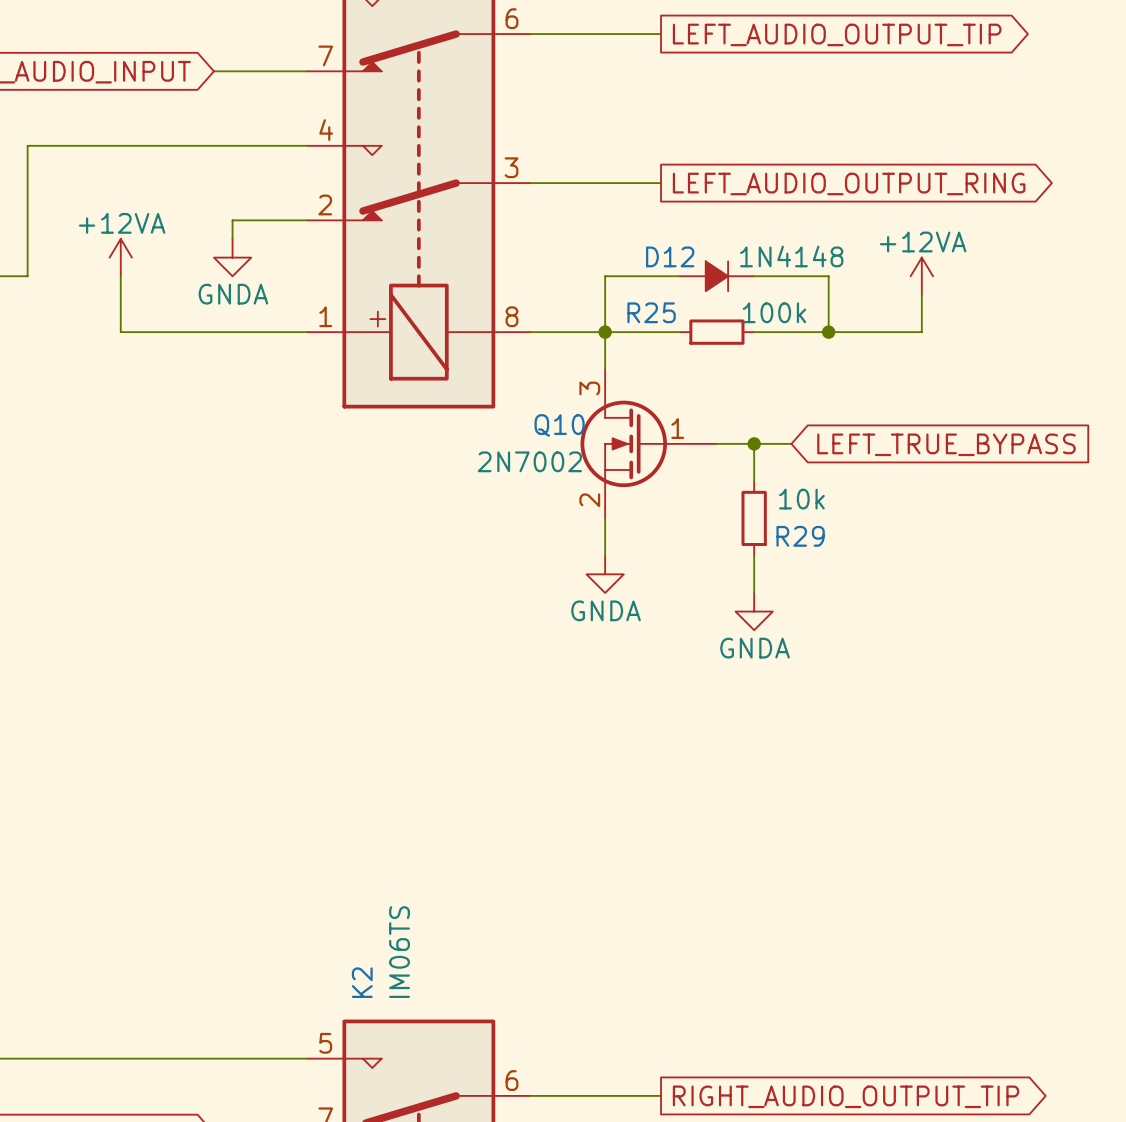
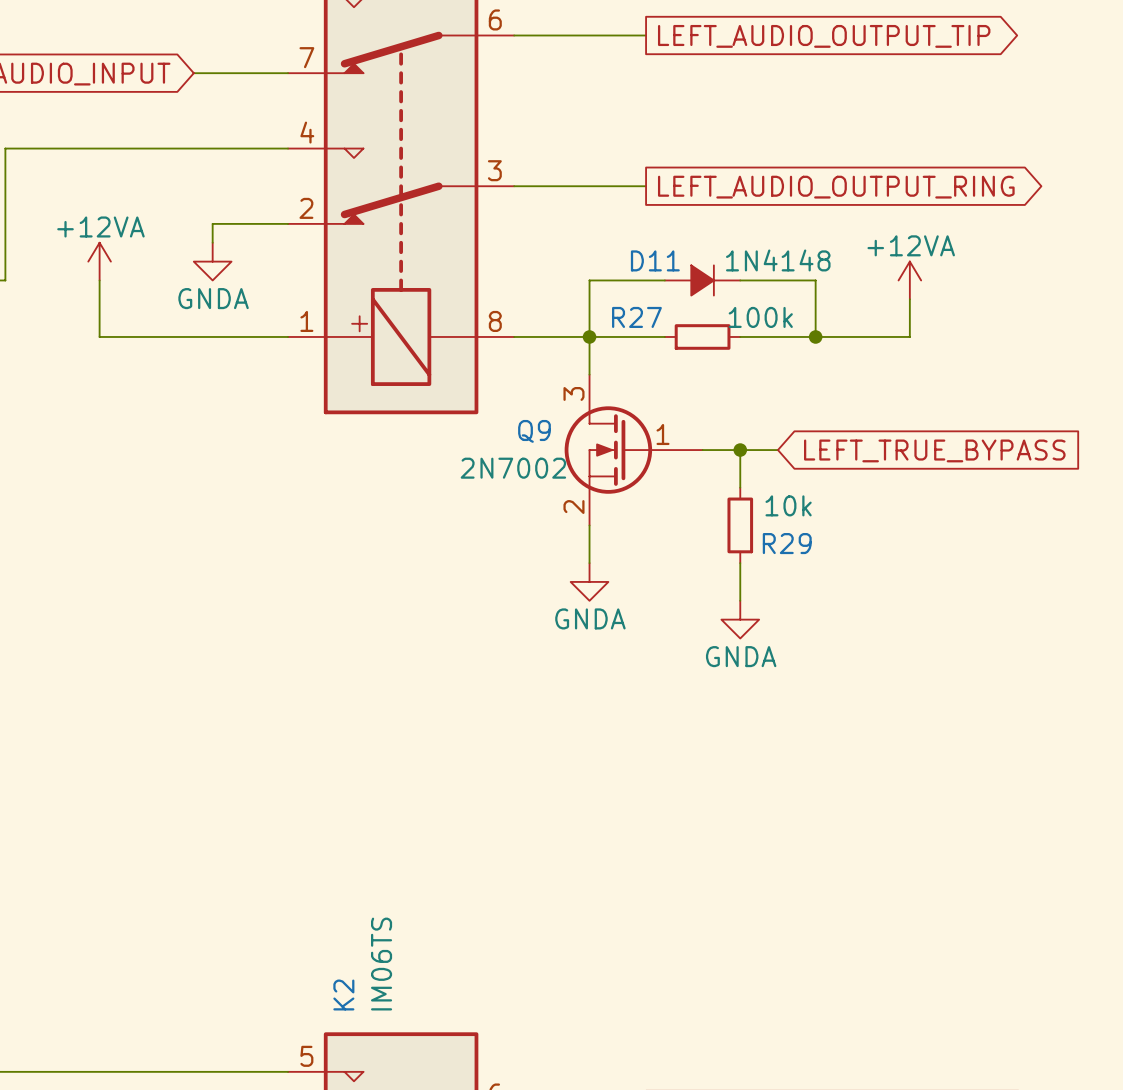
D12 name: D12 (670, 256) -> D11 (655, 260)
R25 name: R25 (651, 312) -> R27 (636, 317)
Q10 name: Q10 (559, 425) -> Q9 (534, 431)

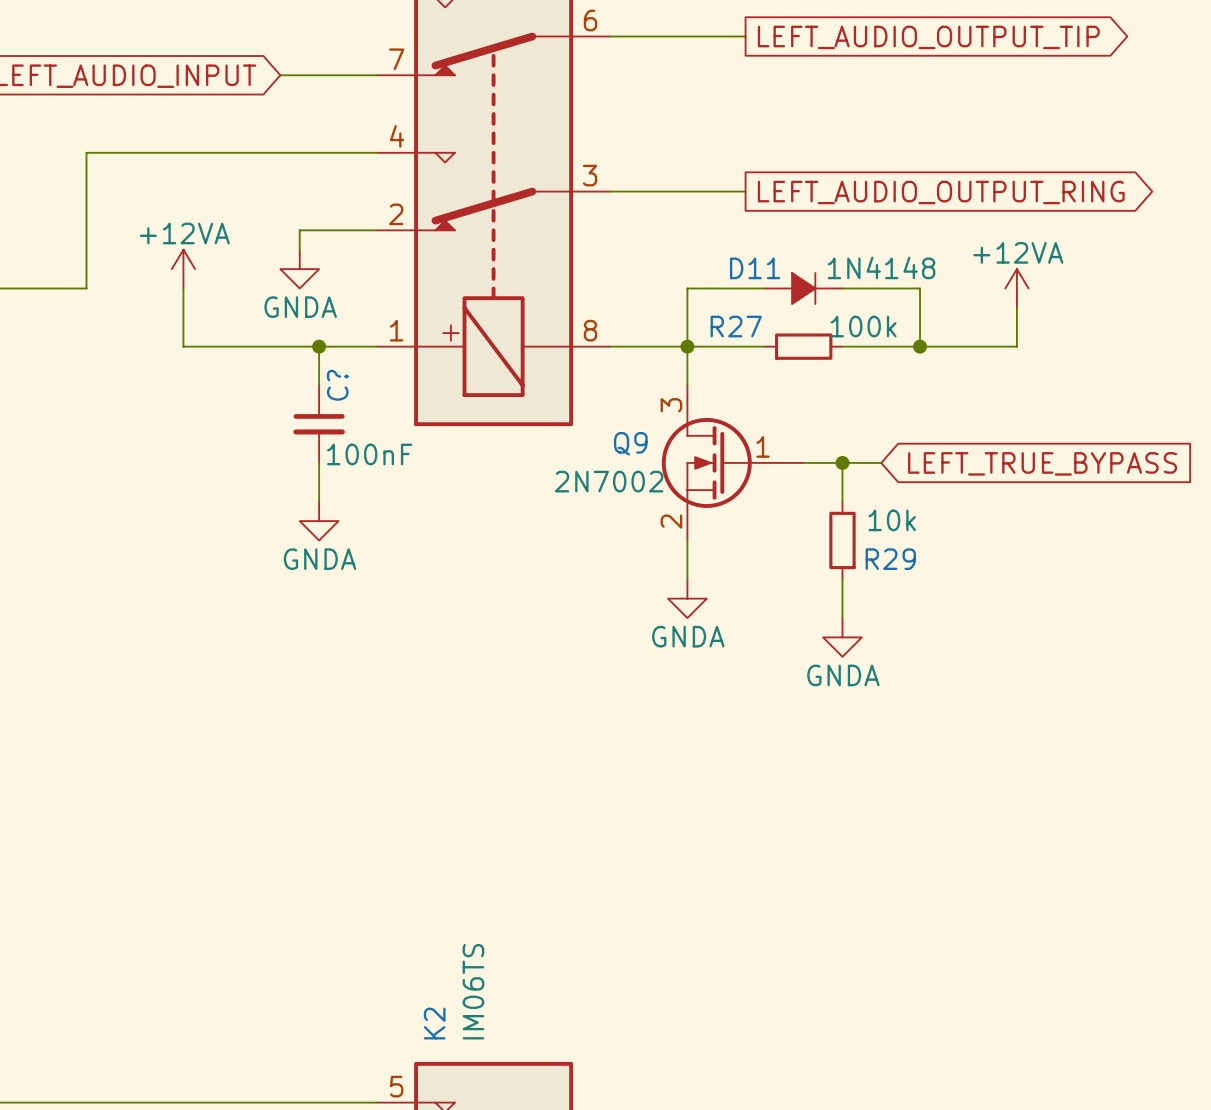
wire: none -> (319, 346) (319, 385)
junction: none -> (319, 346)
C?: none -> 100nF (319, 424)
wire: none -> (319, 462) (319, 501)
power symbol: none -> GNDA (319, 521)

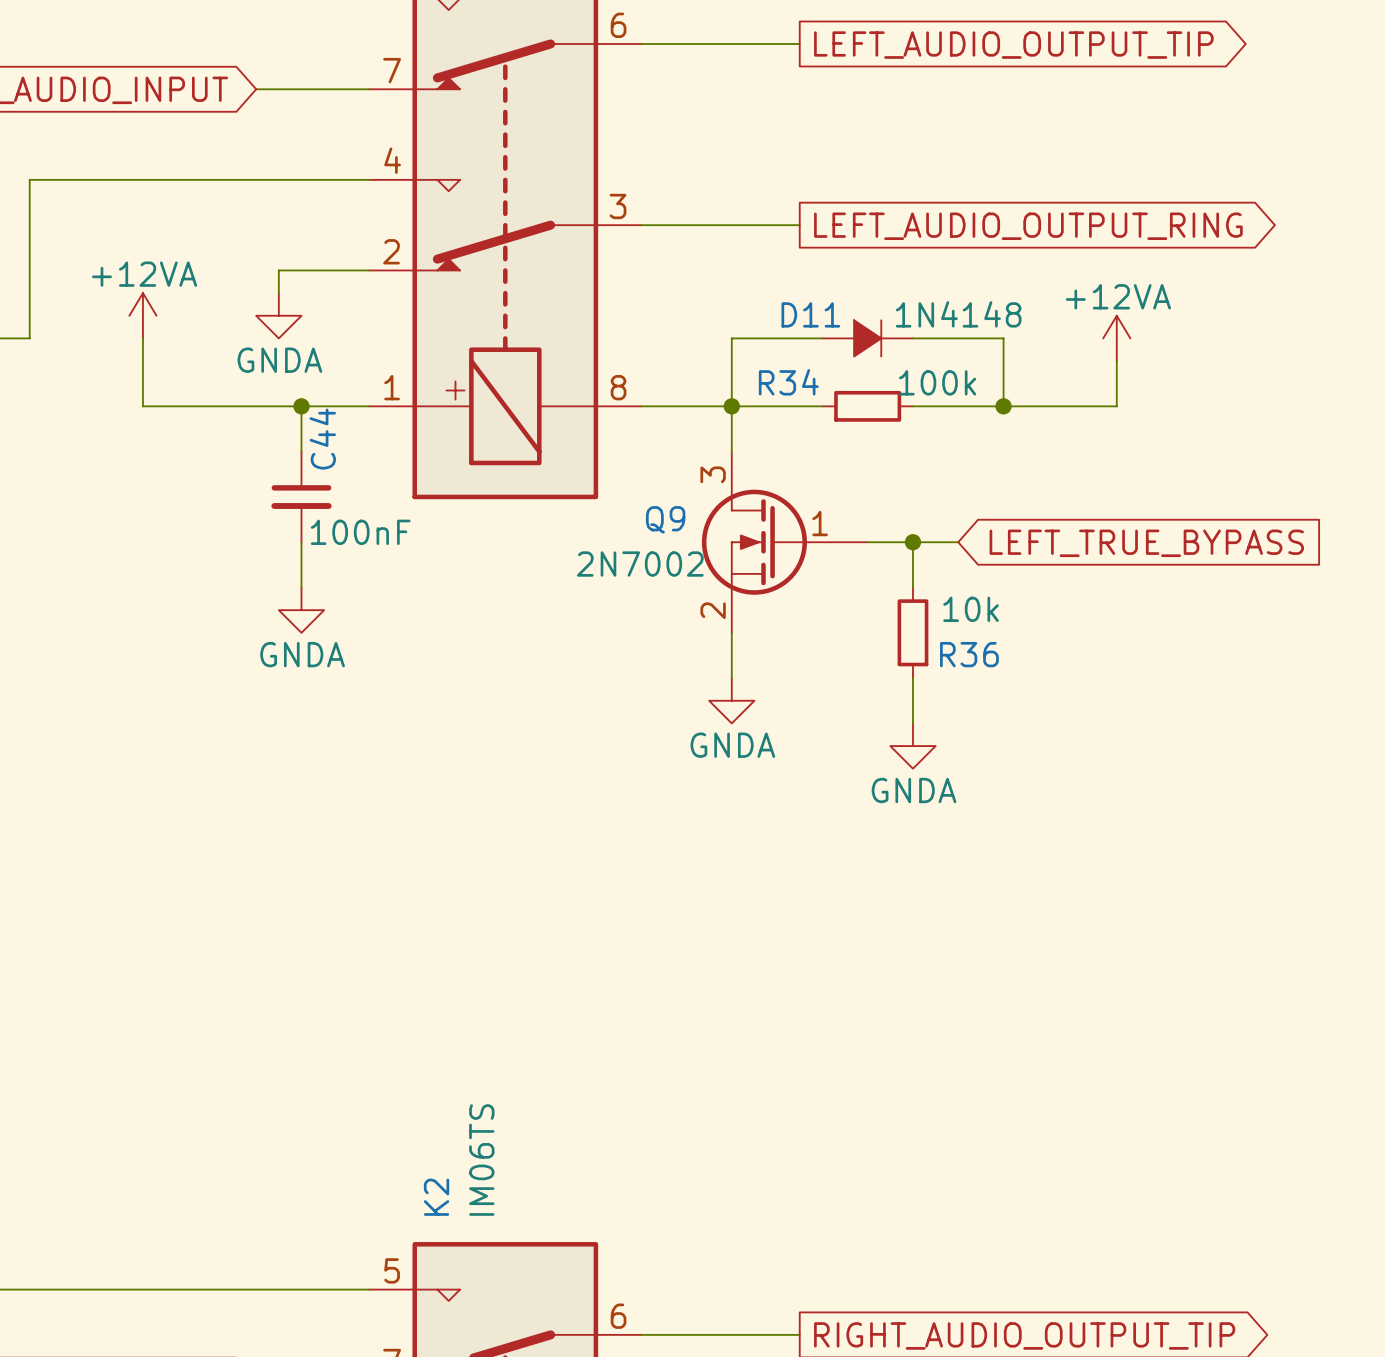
R27 name: R27 (736, 326) -> R34 (788, 382)
C? name: C? (337, 385) -> C44 (322, 439)
R29 name: R29 (890, 559) -> R36 (969, 654)

